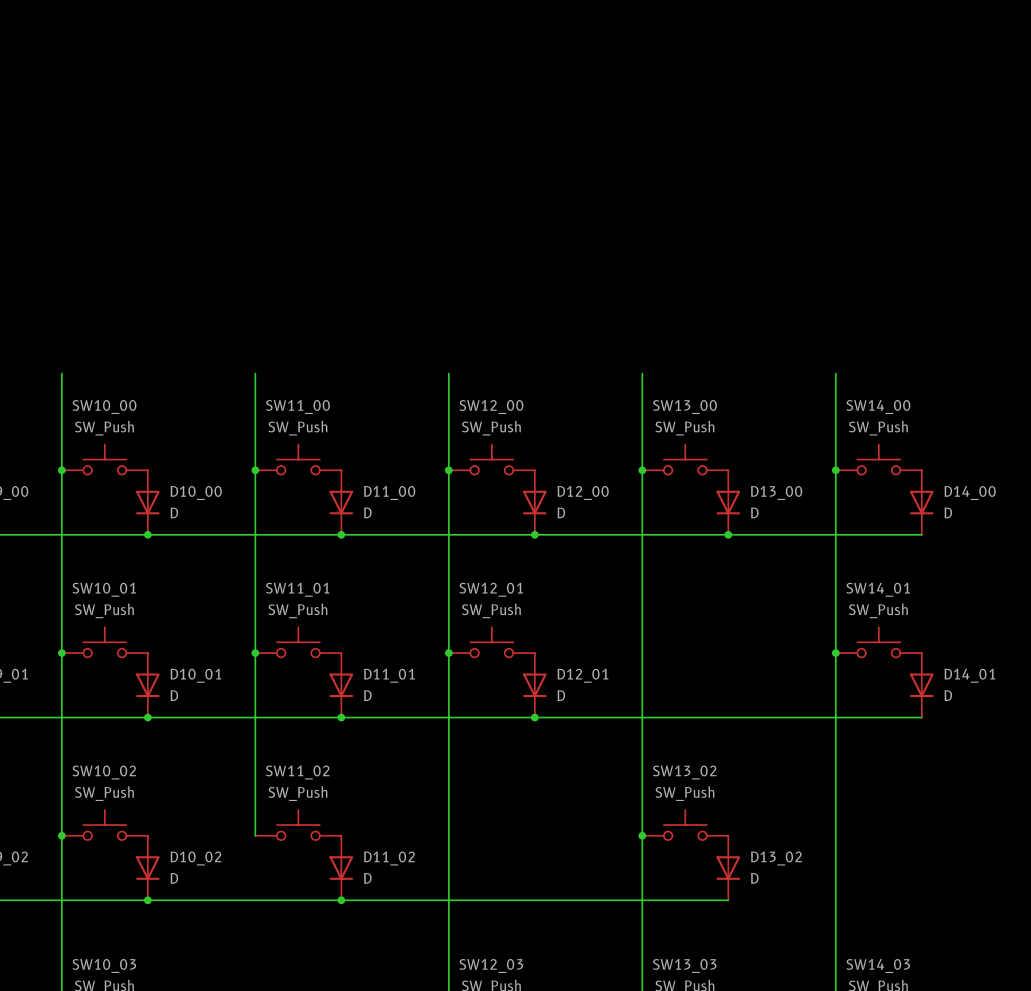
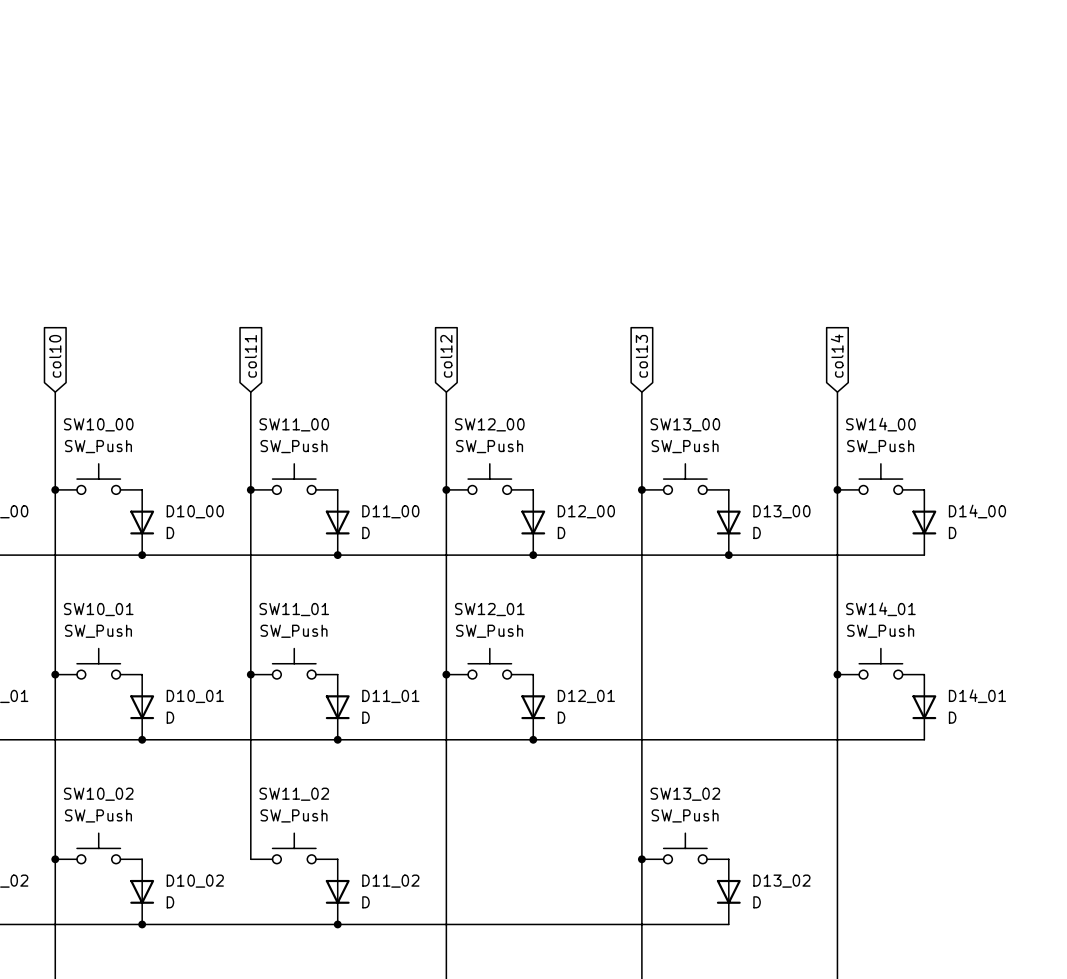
global label: none -> col10 (55, 356)
global label: none -> col11 (250, 356)
global label: none -> col12 (446, 356)
global label: none -> col13 (641, 356)
global label: none -> col14 (837, 356)

